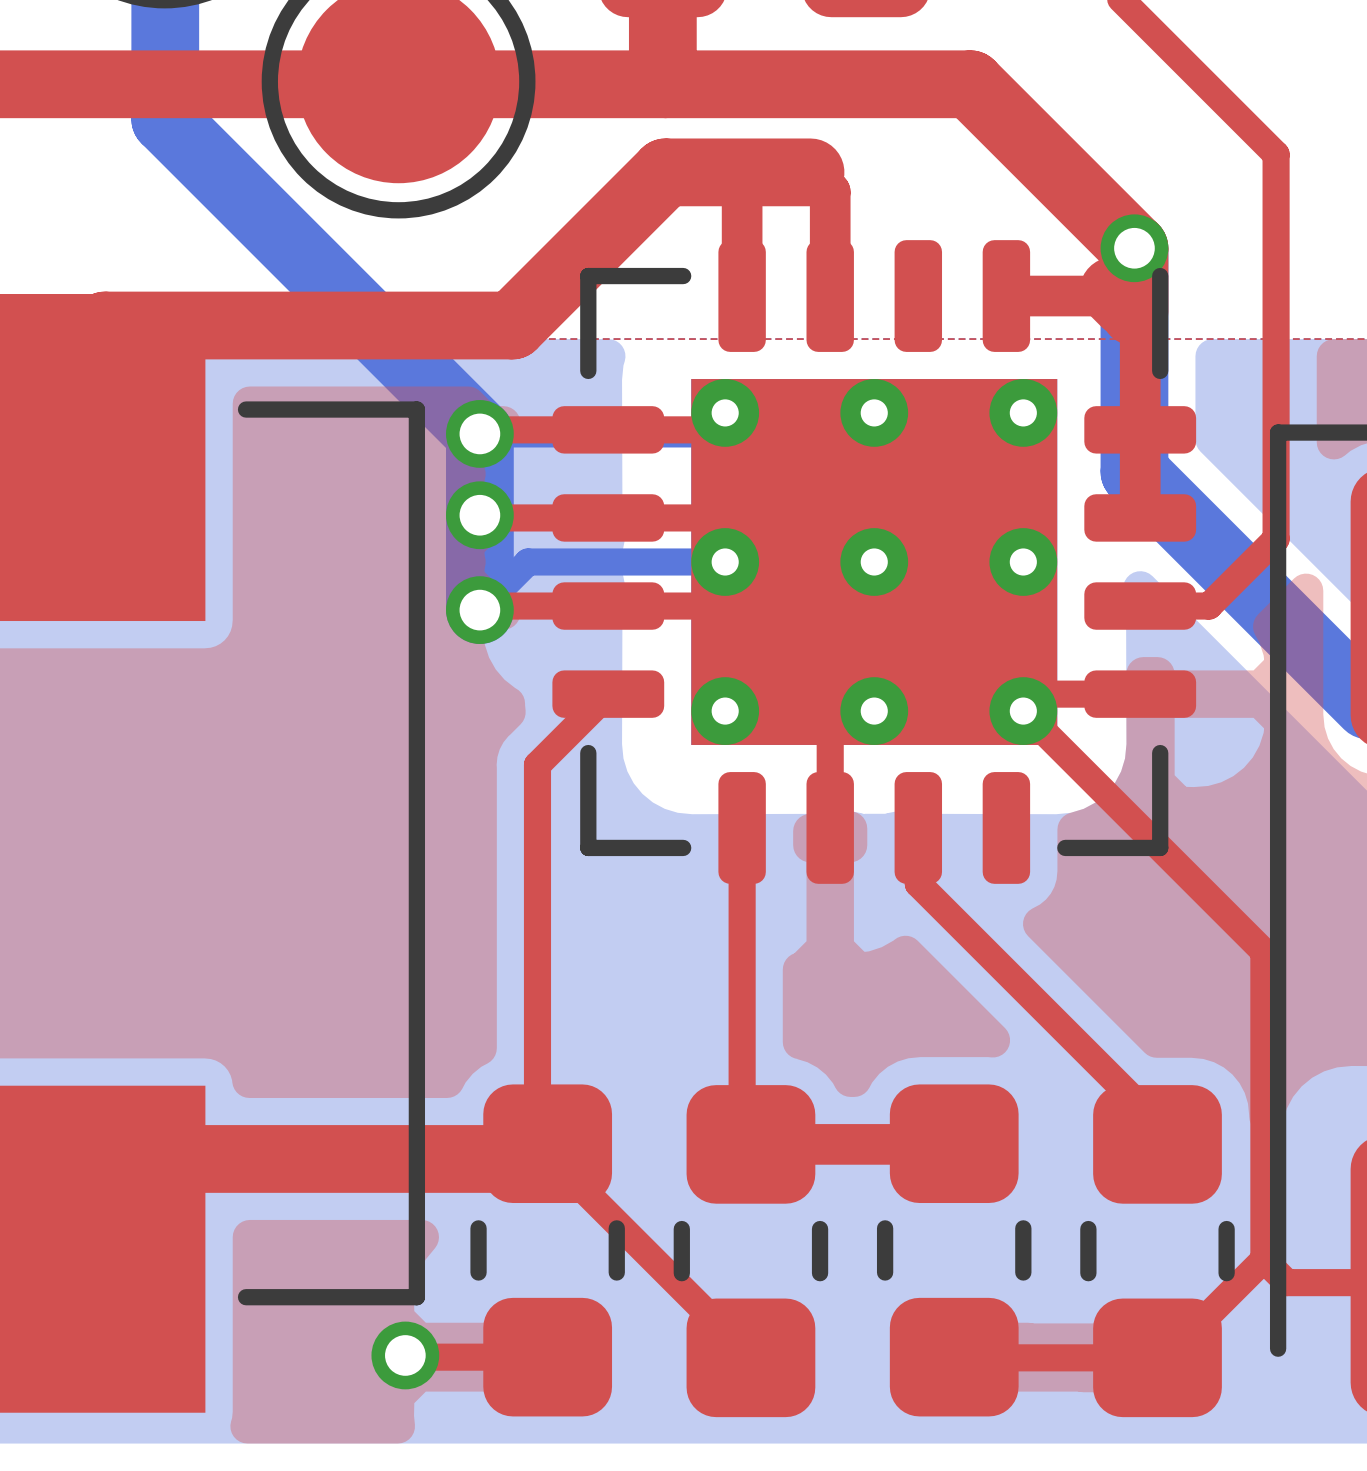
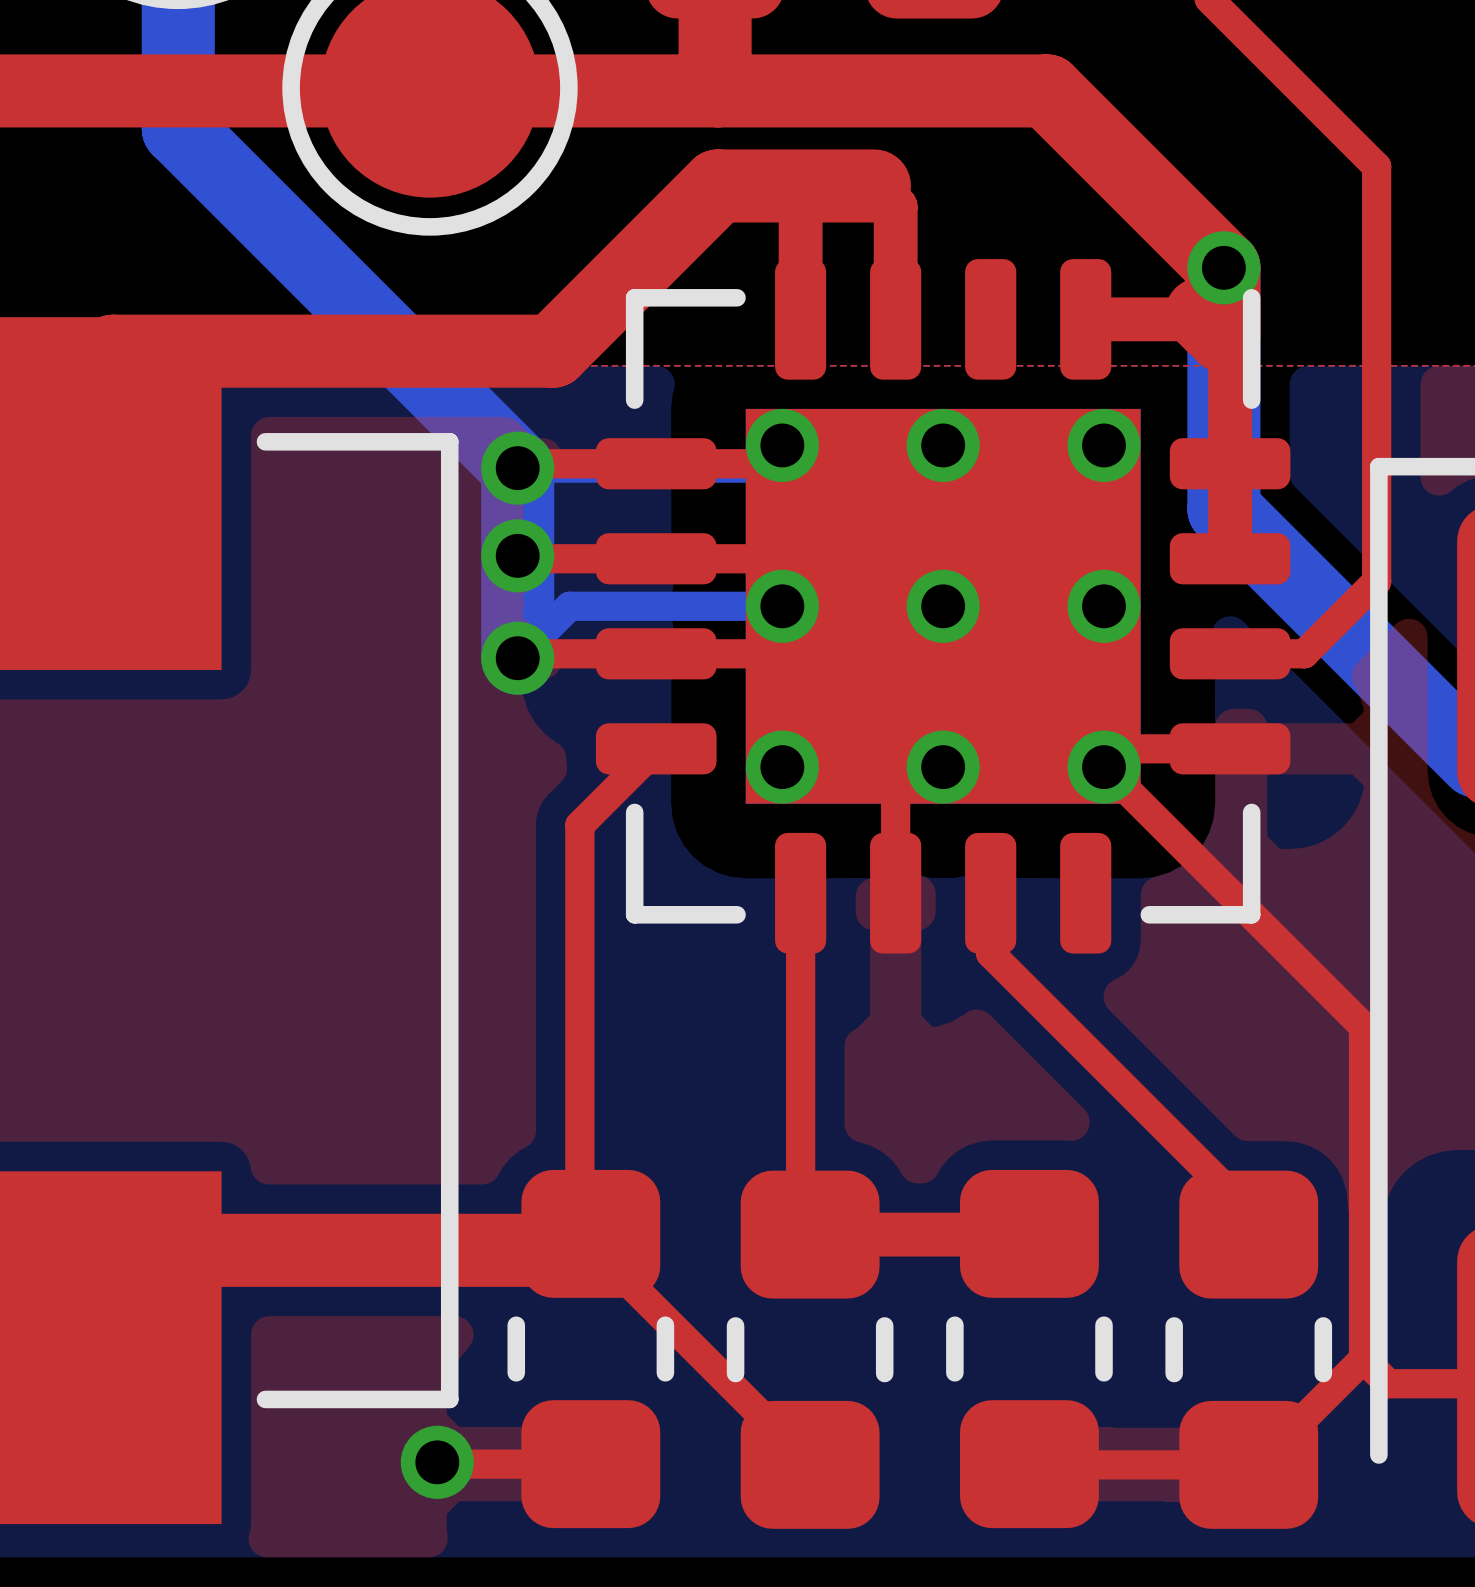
part footprint: [552, 240, 1197, 884] -> [595, 259, 1291, 954]

